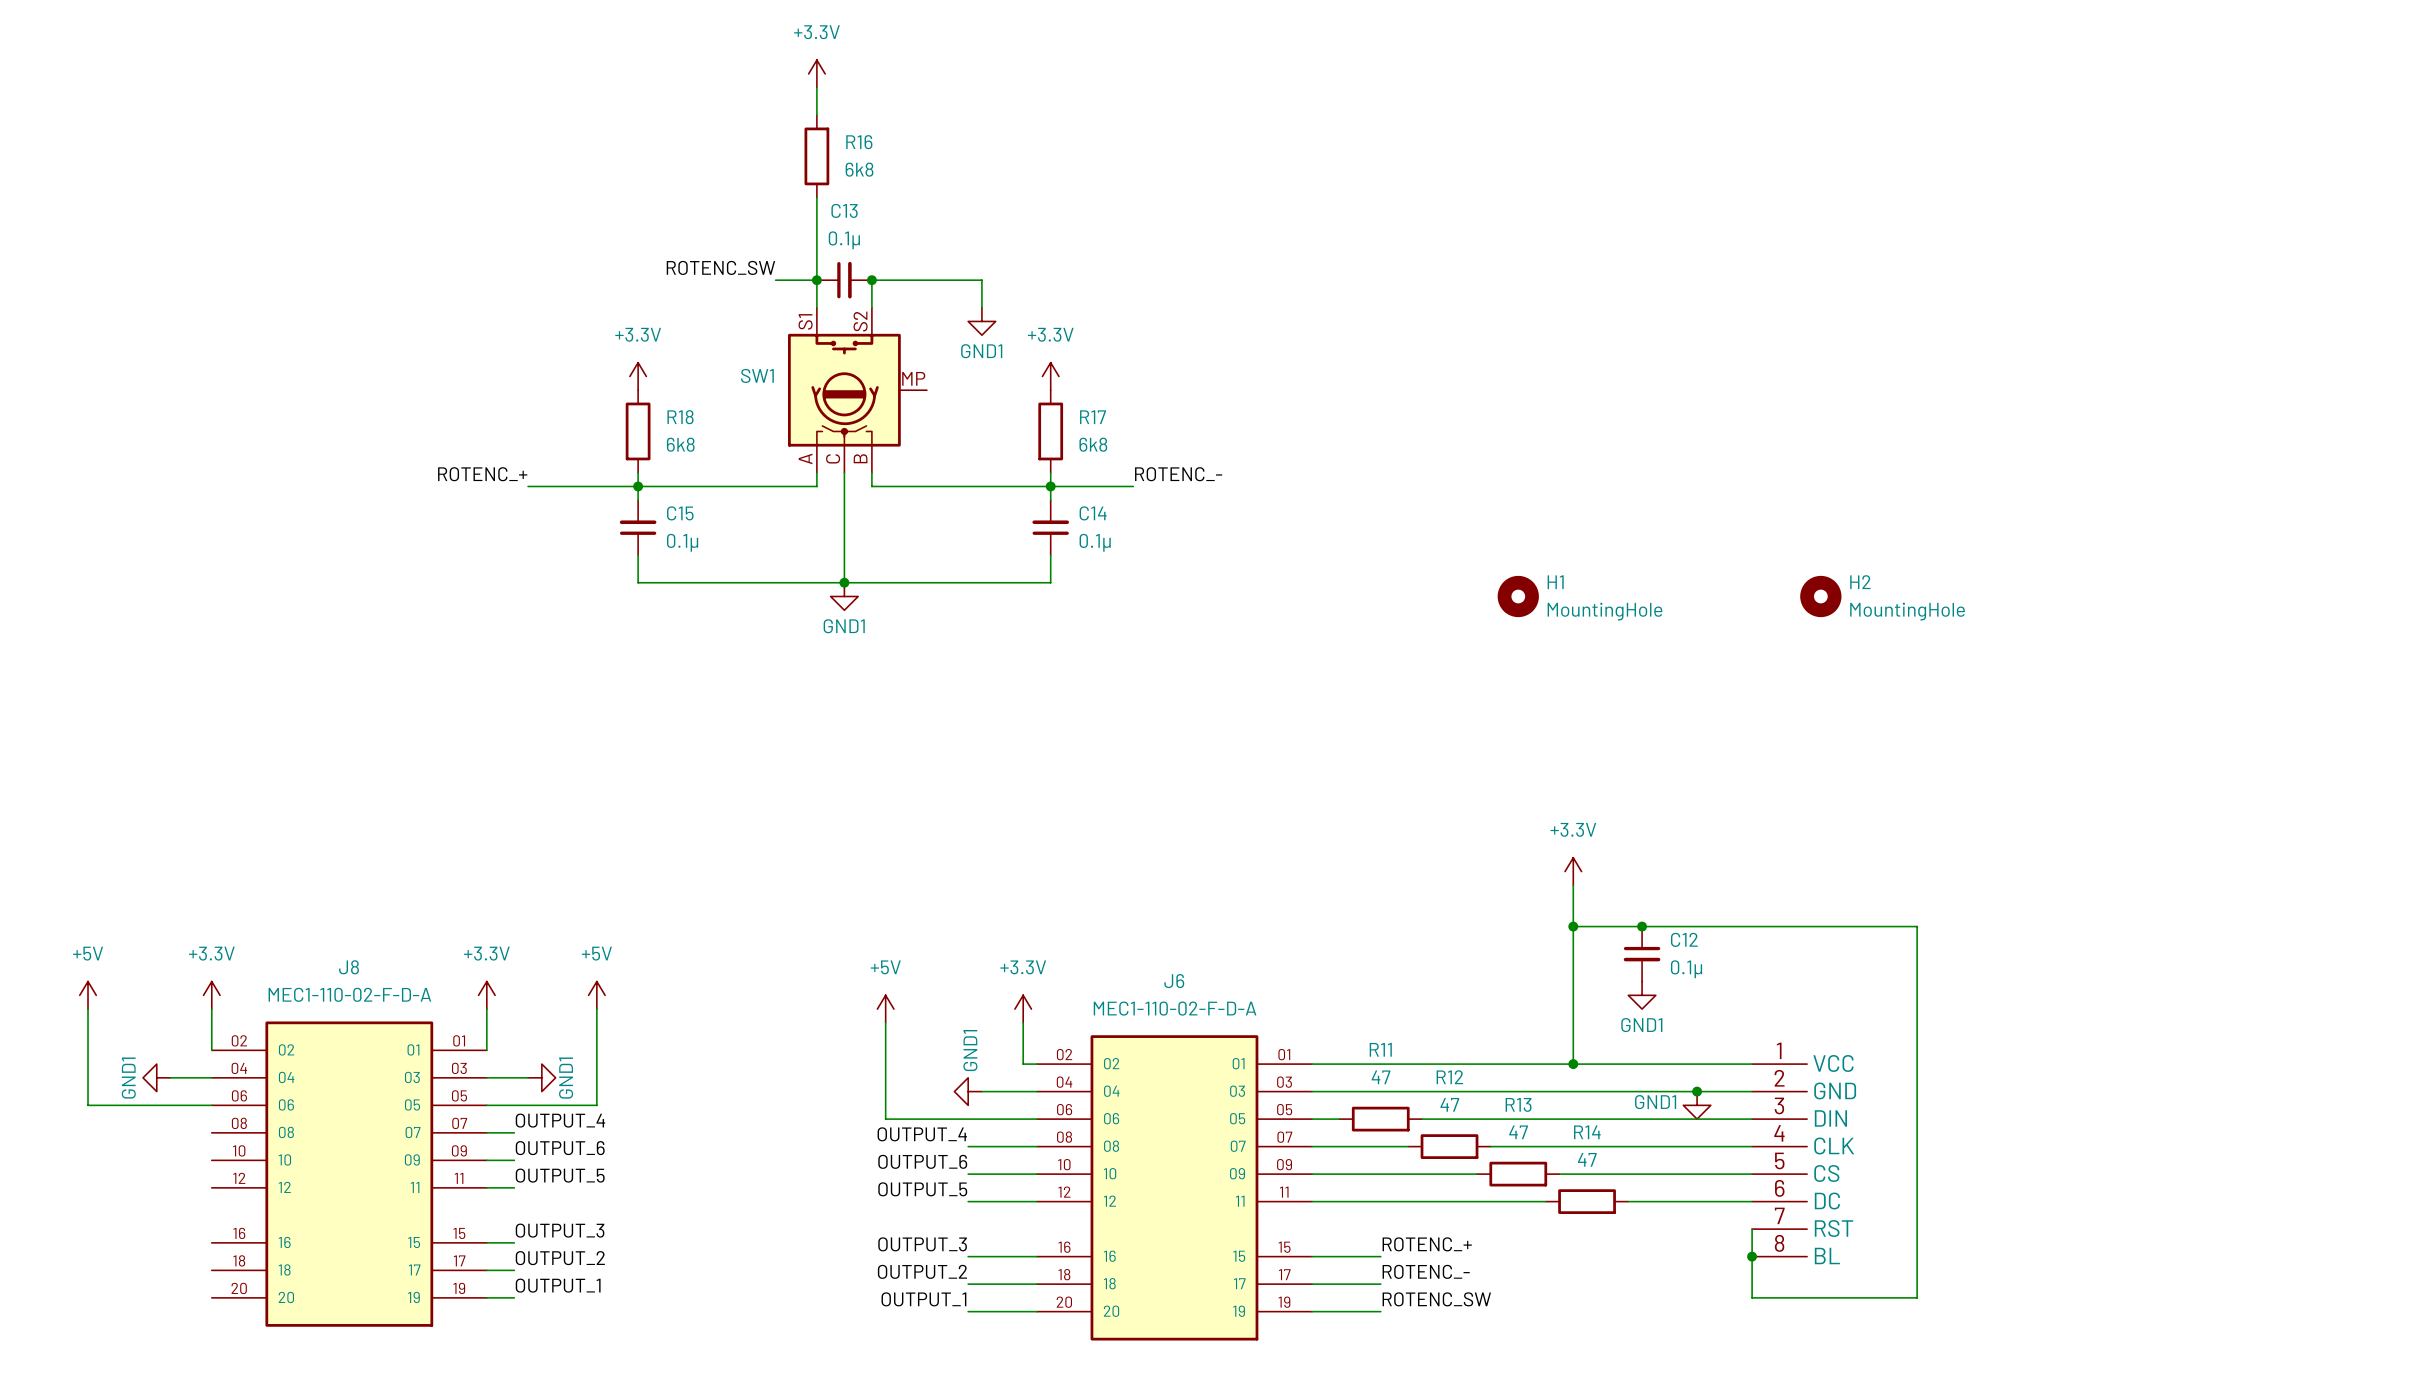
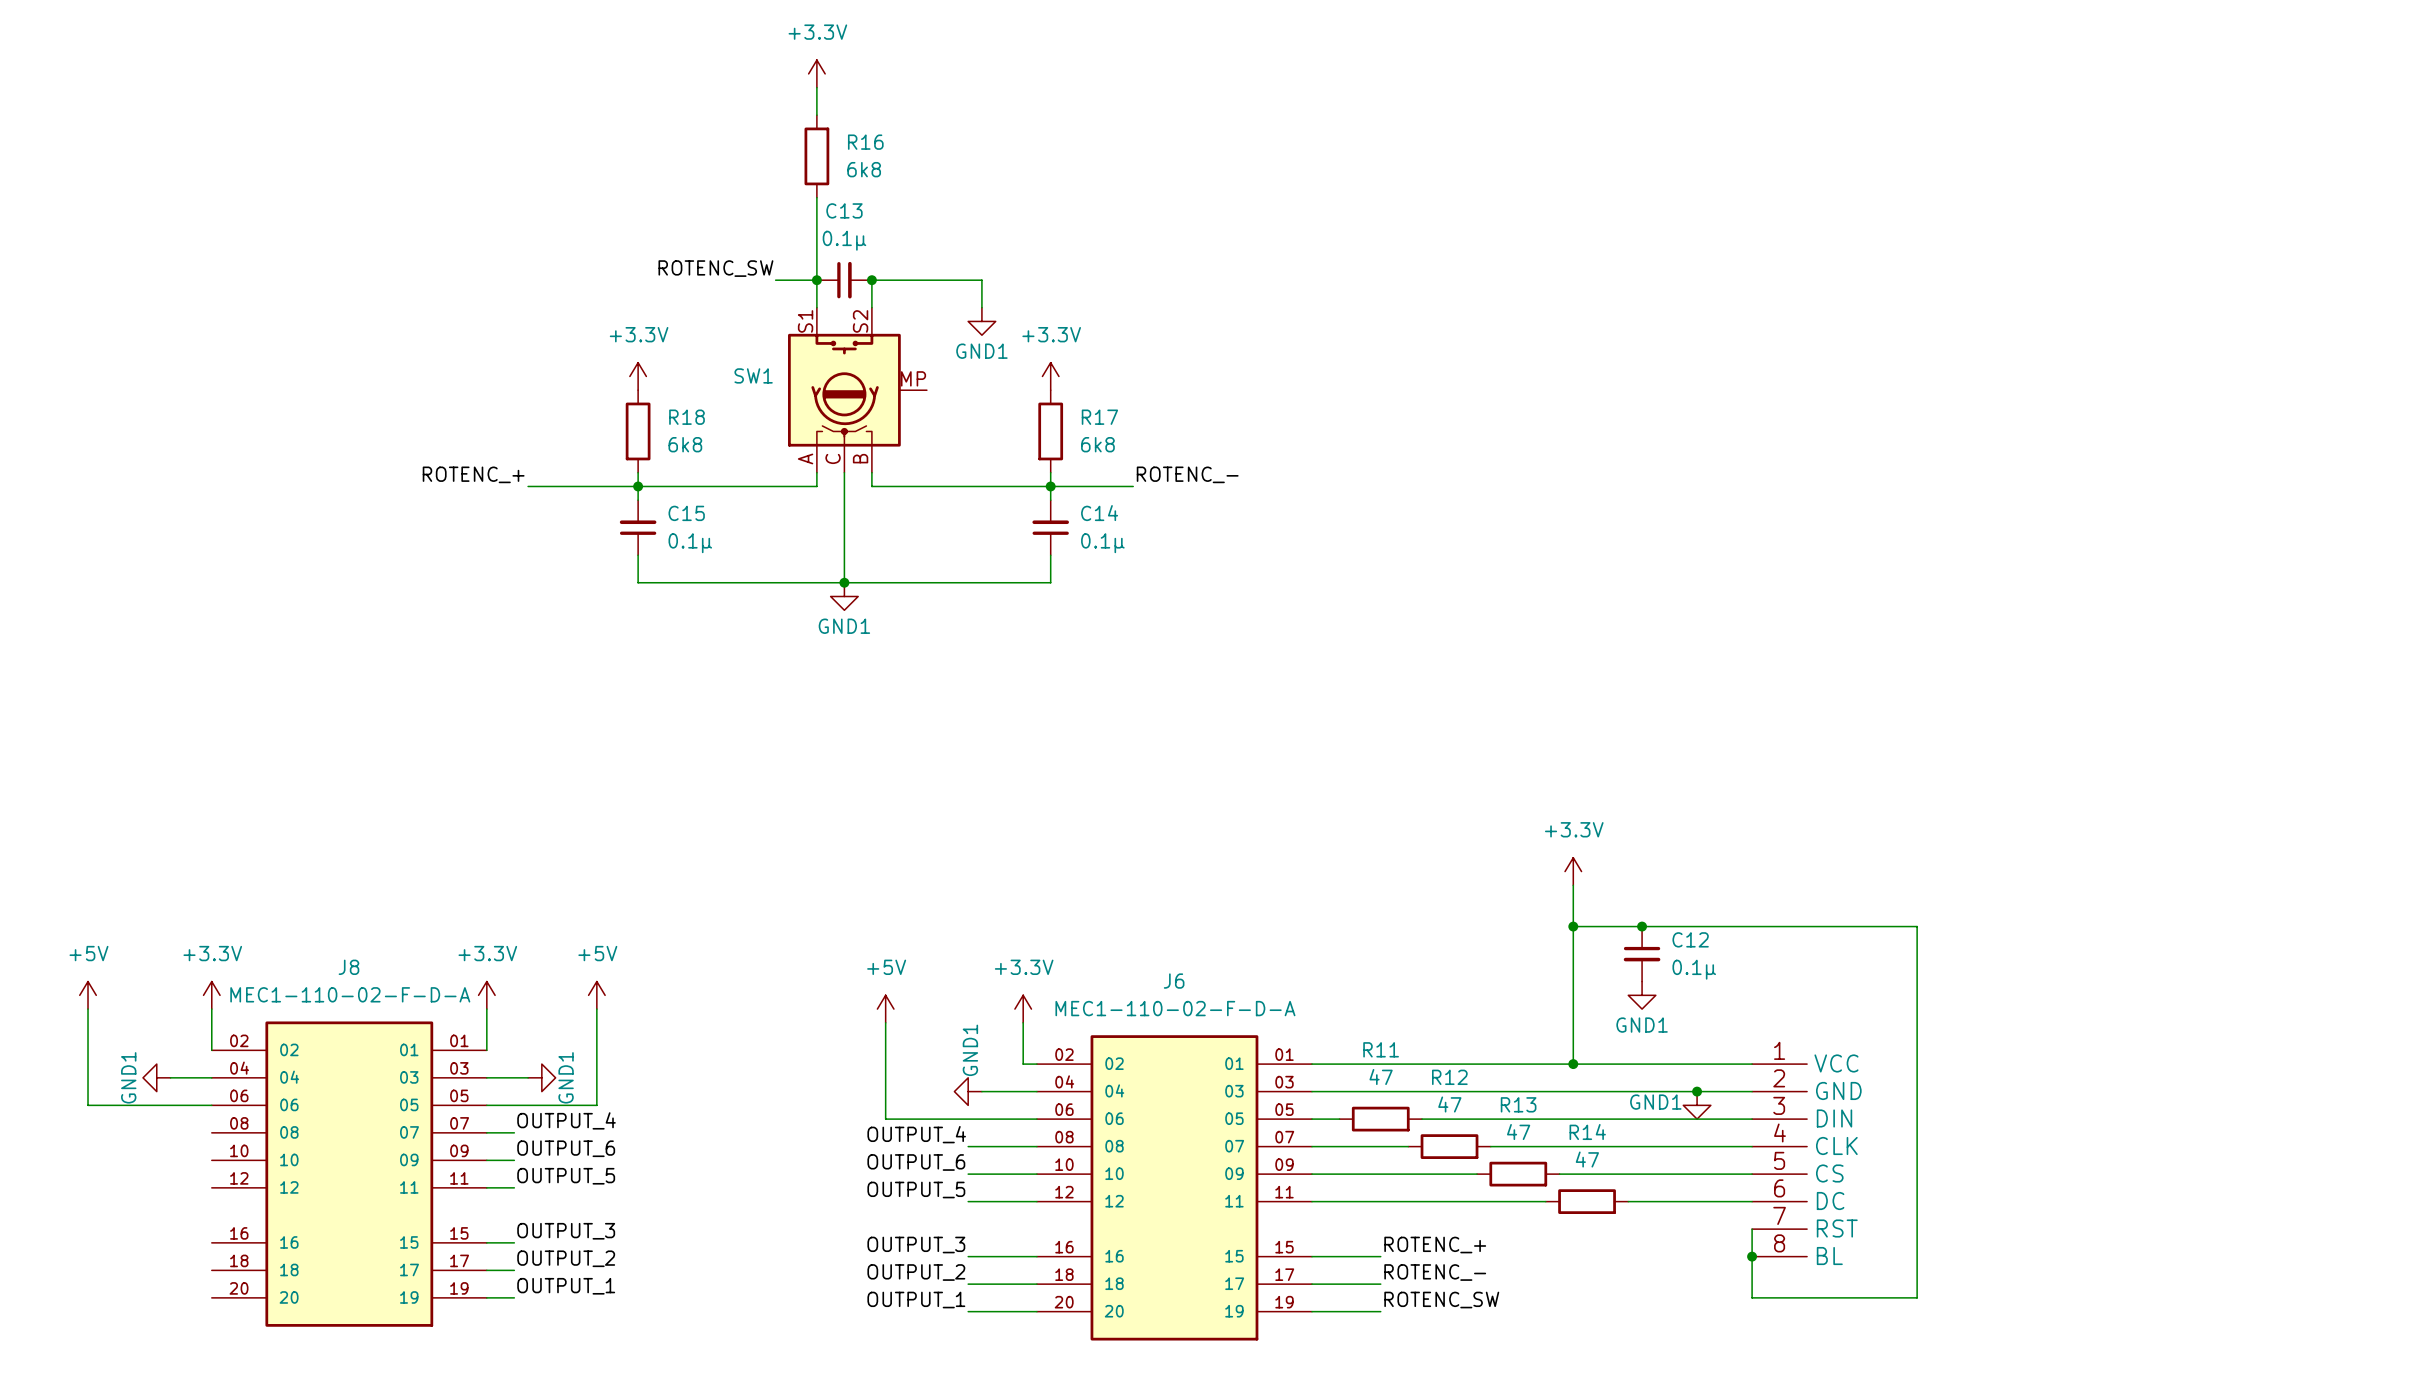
H1: MountingHole (1518, 596) -> none
H2: MountingHole (1820, 596) -> none

